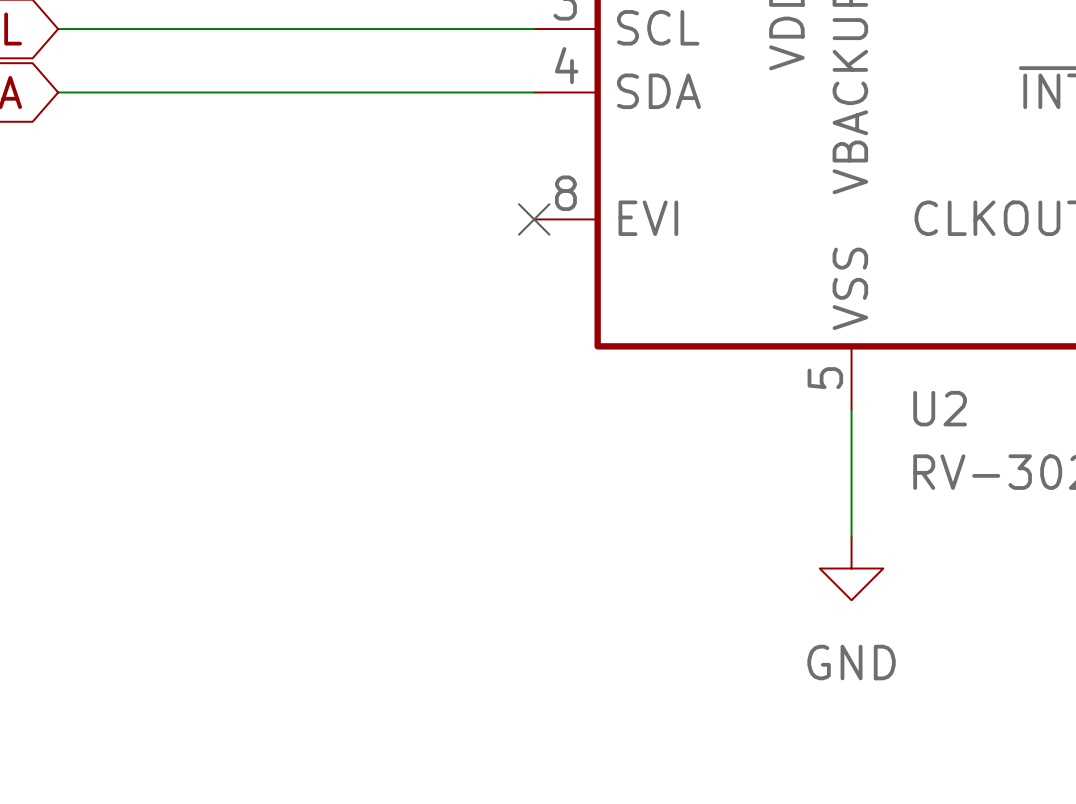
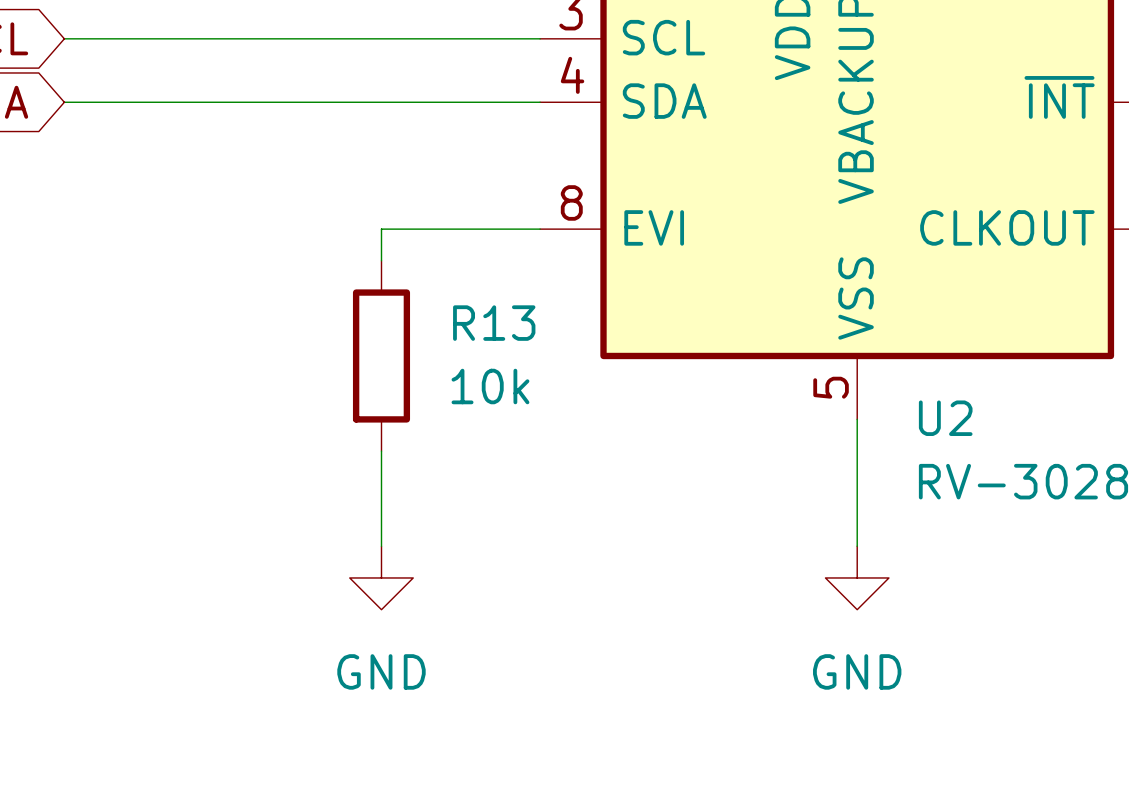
wire: none -> (540, 229) (381, 229) (381, 260)
no-connect mark: (534, 219) -> none
R13: none -> 10k (381, 355)
wire: none -> (381, 451) (381, 546)
power symbol: none -> GND (381, 577)

